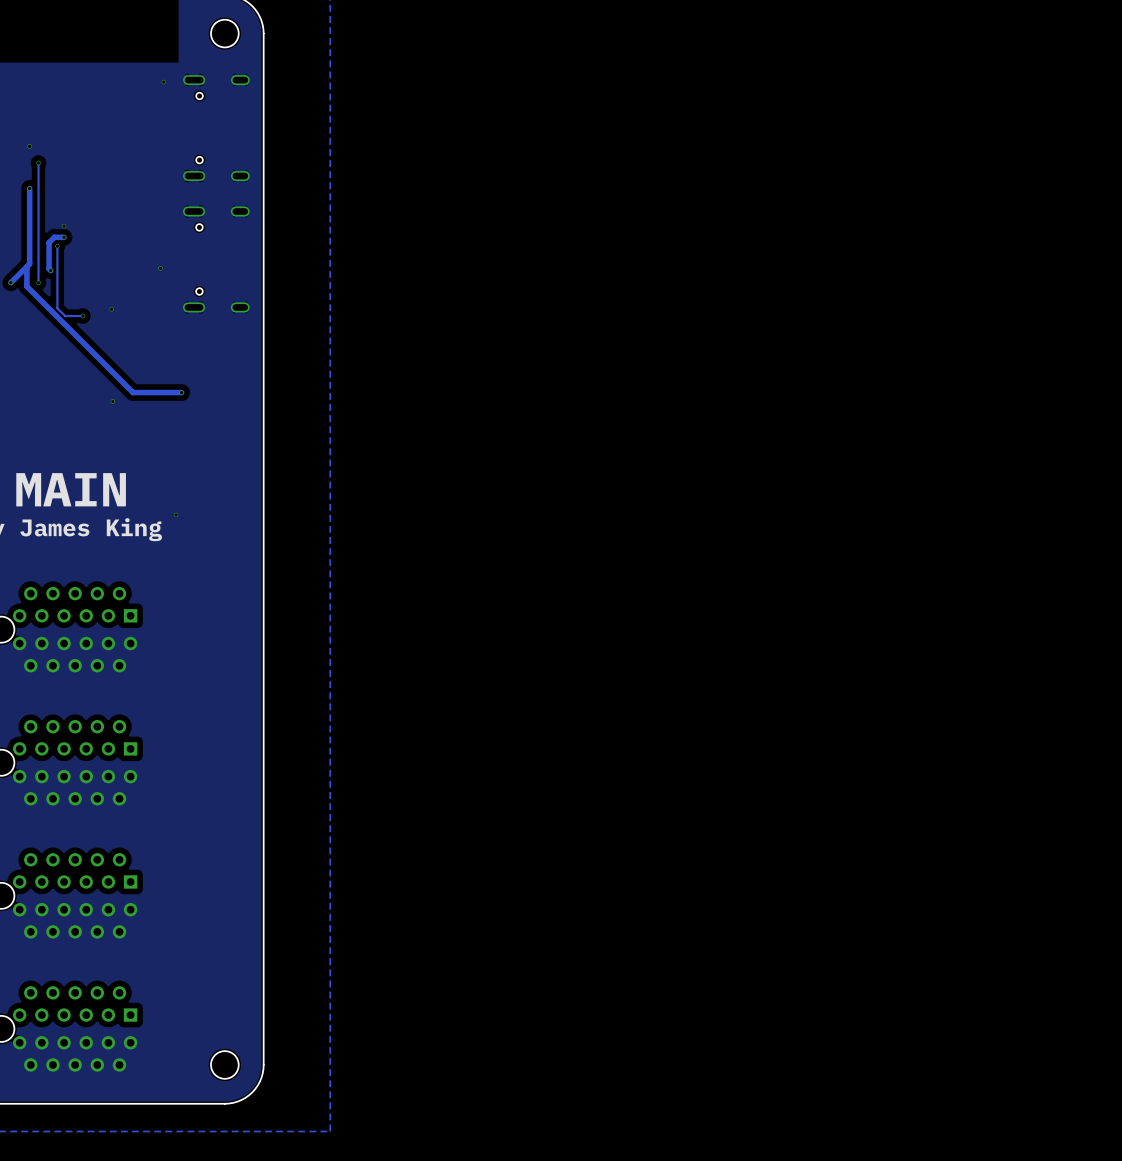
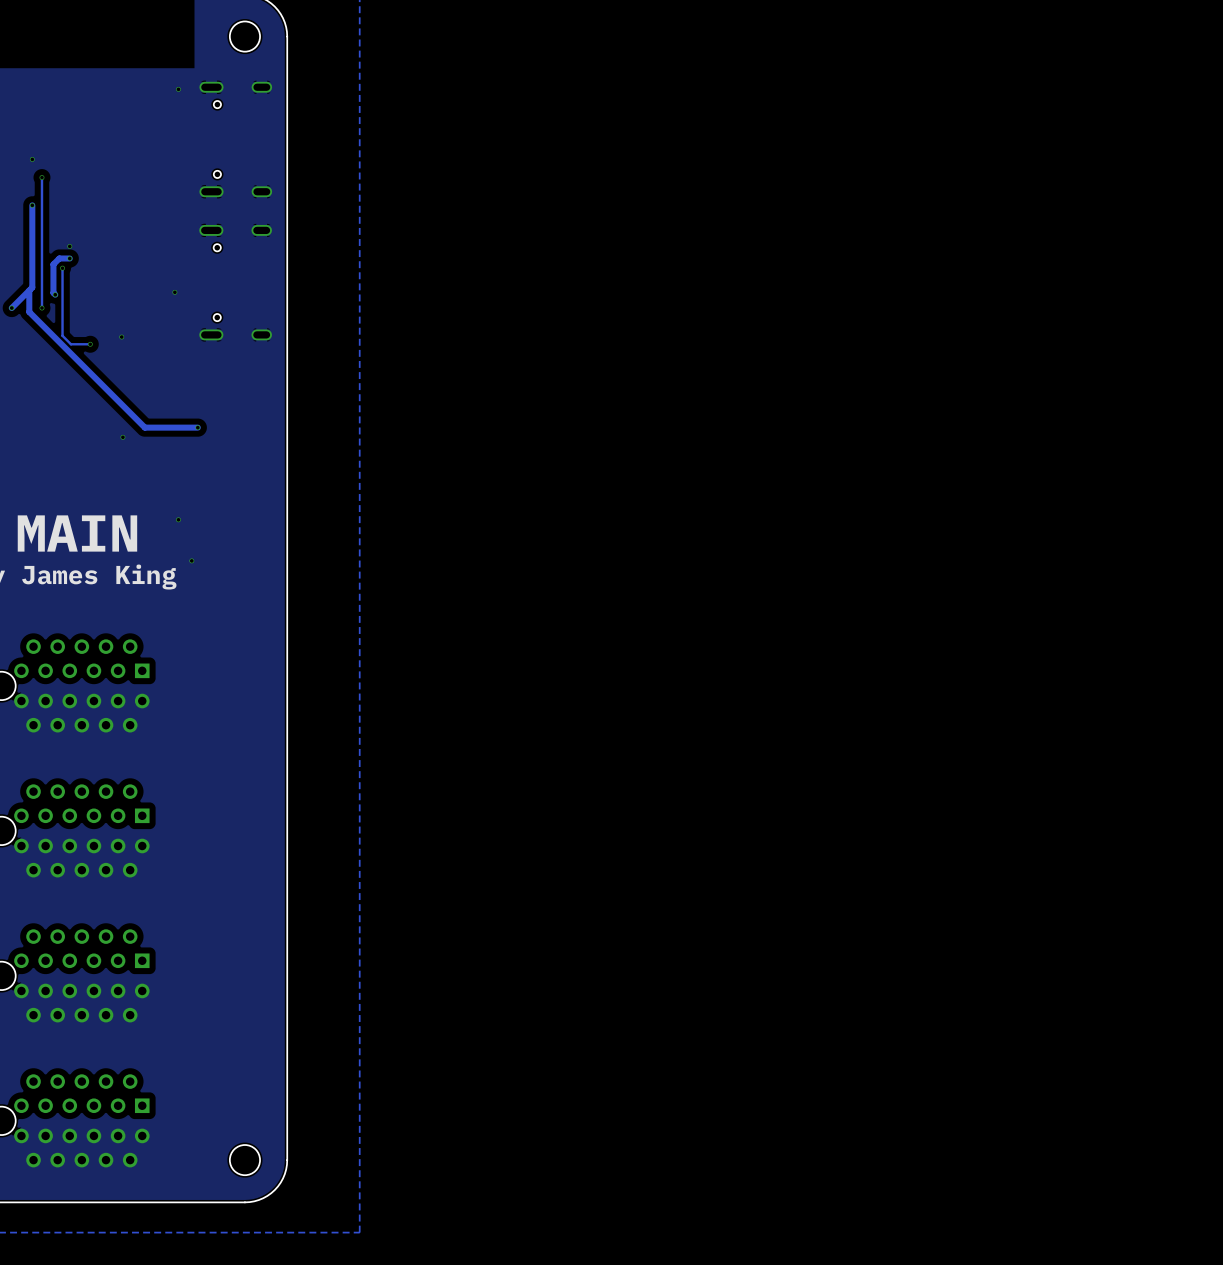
via: none -> (178, 519)

